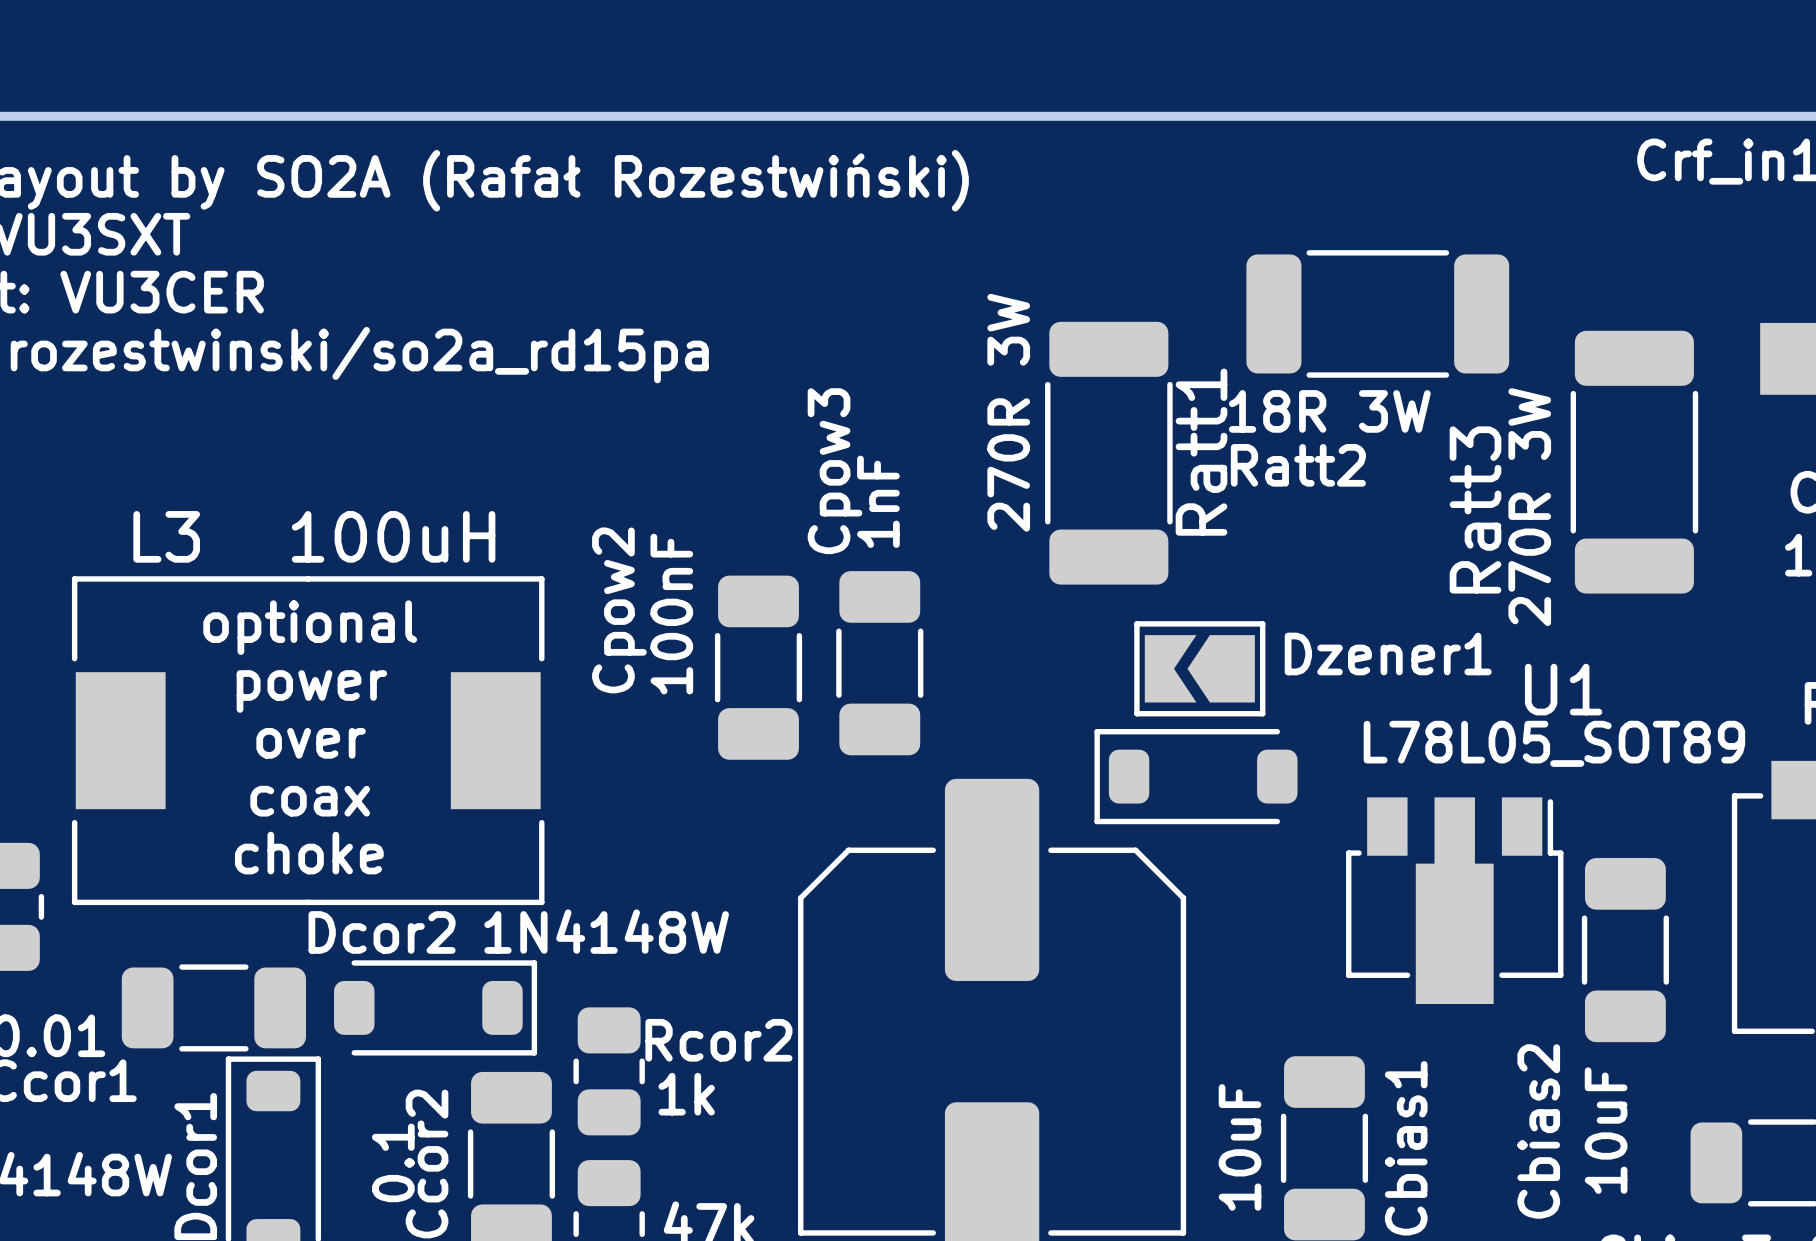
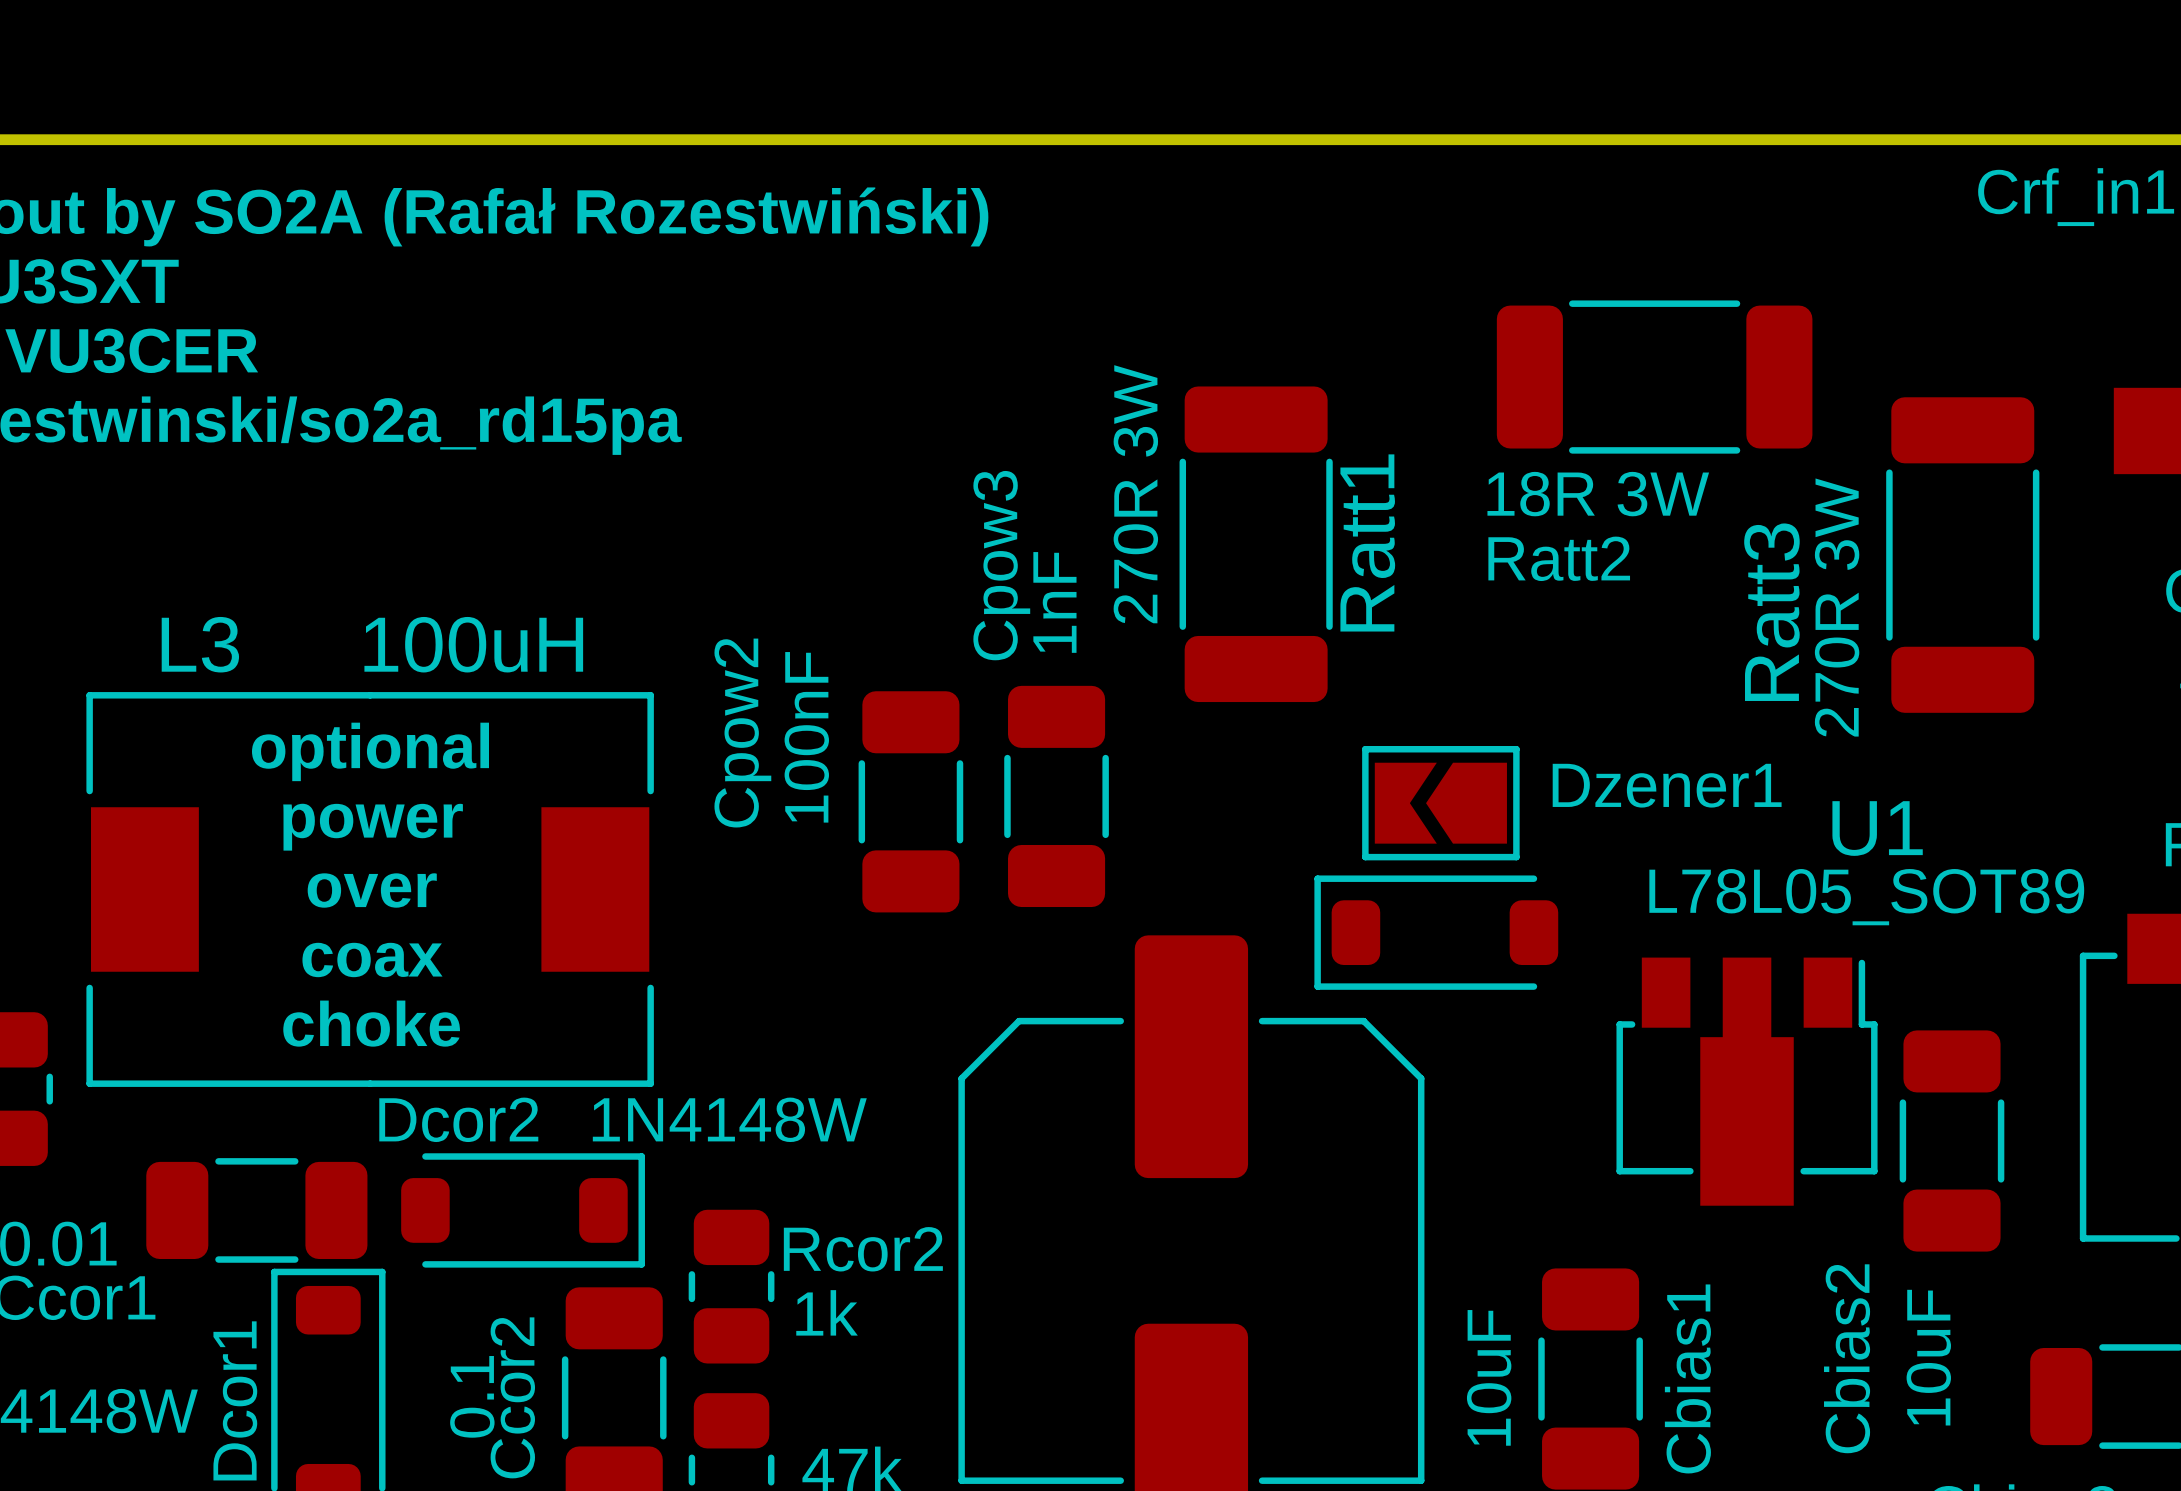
Ratt1 position: (1108, 453) -> (1256, 544)

